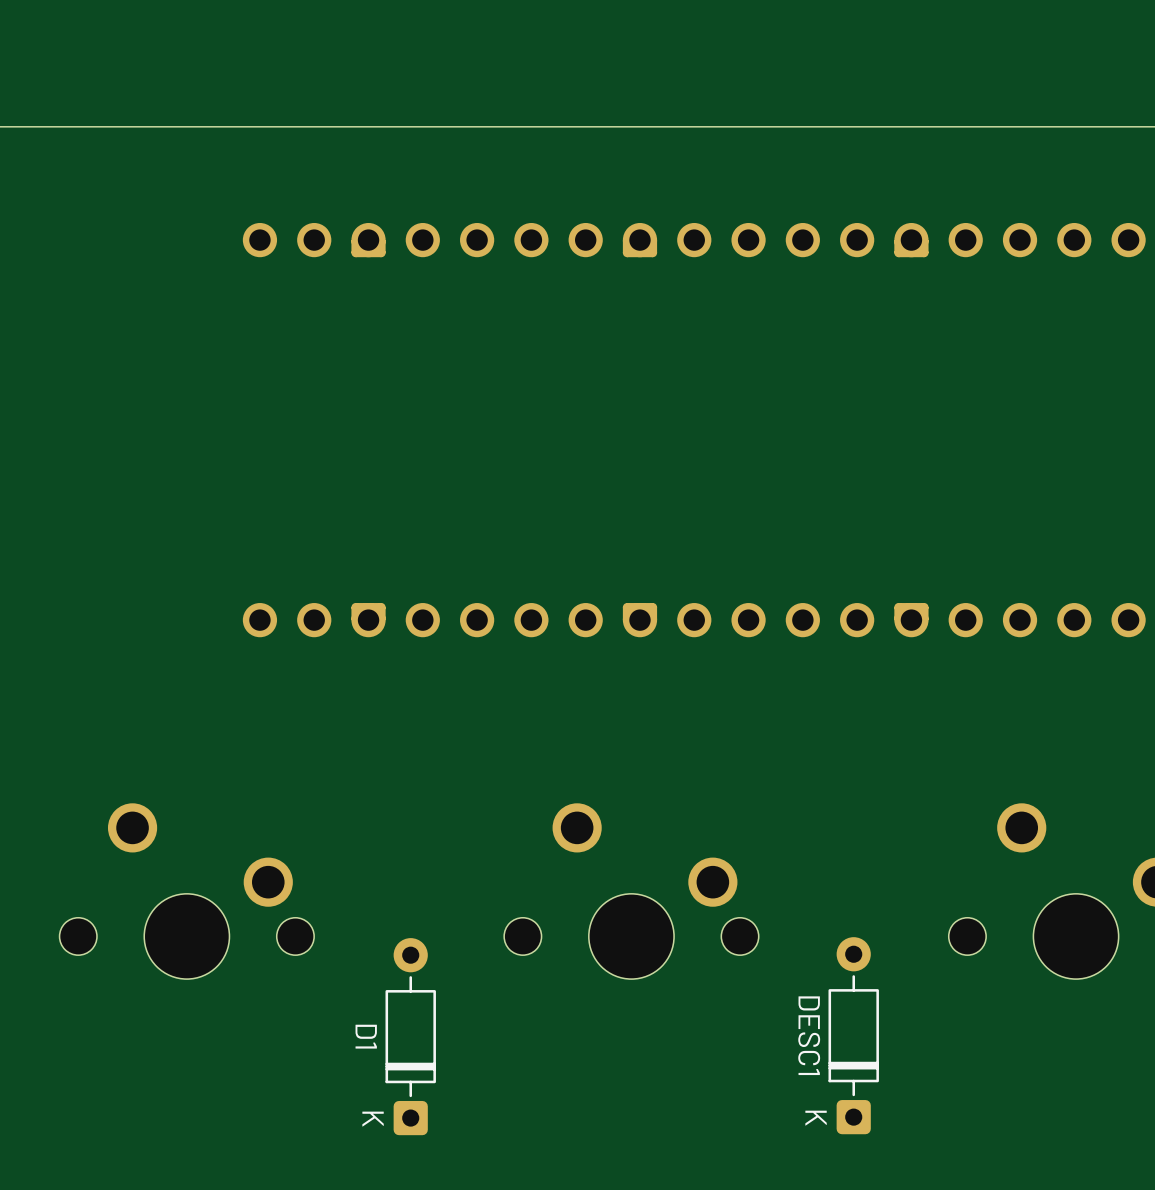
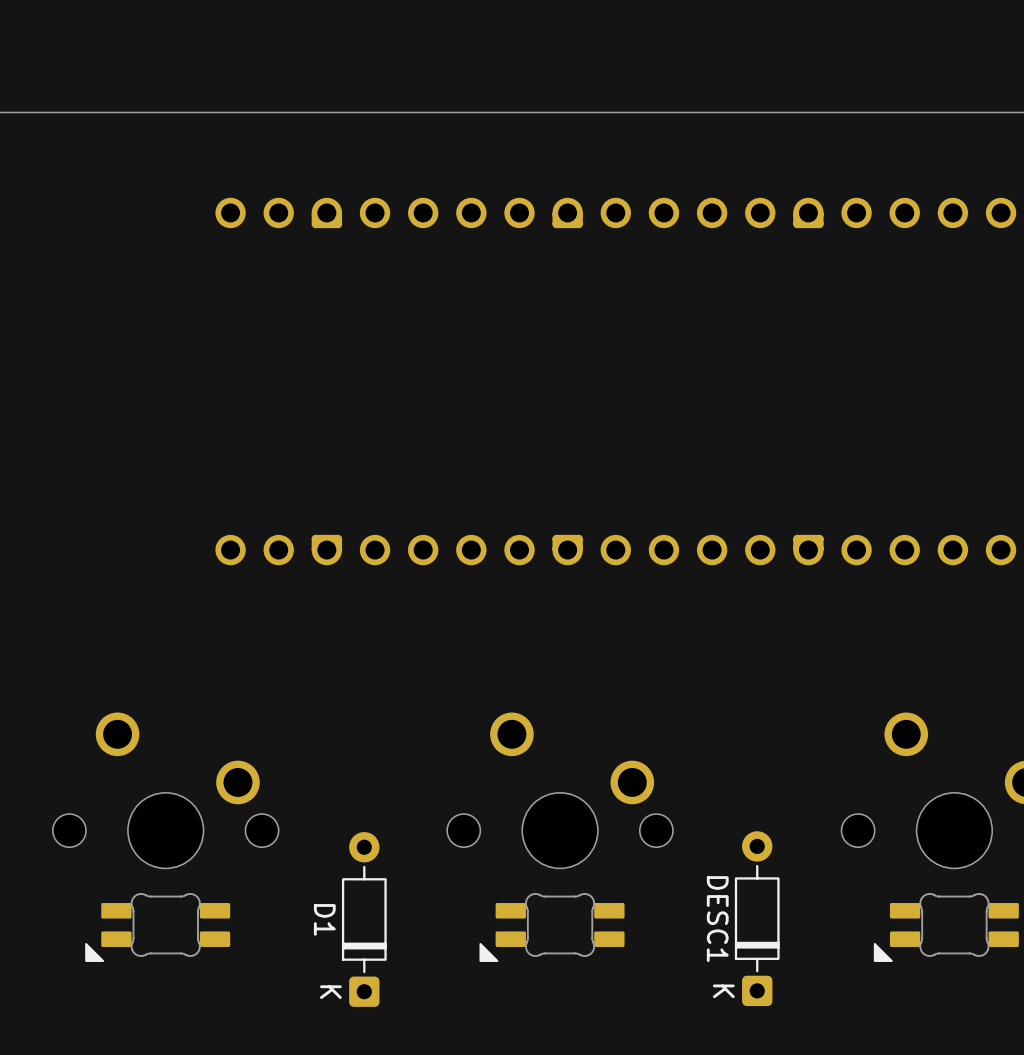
part: none -> (157, 927)
part: none -> (552, 927)
part: none -> (946, 927)

